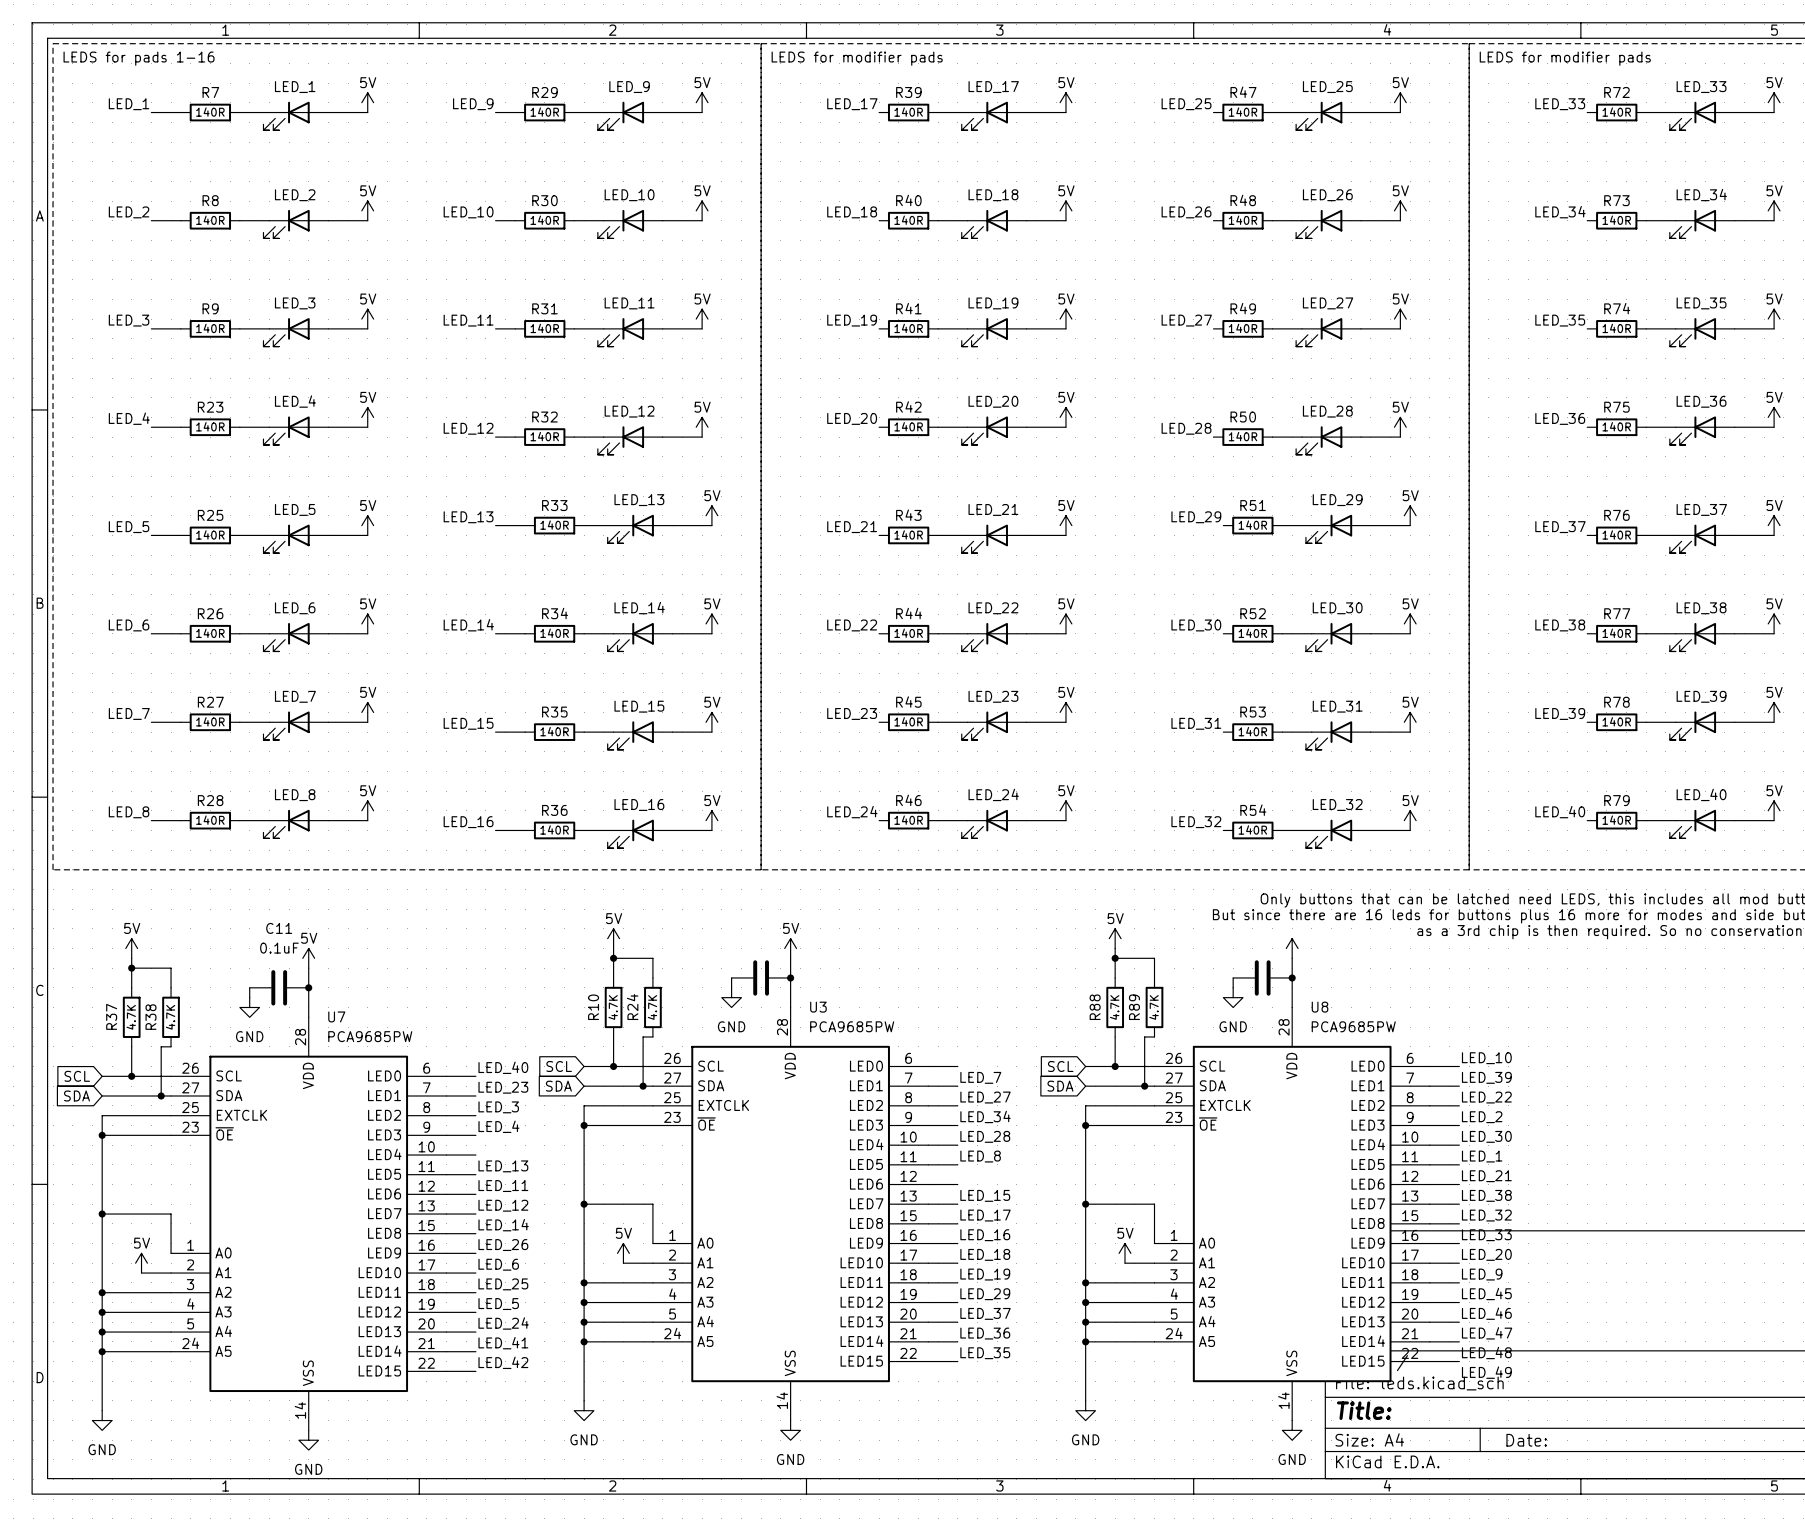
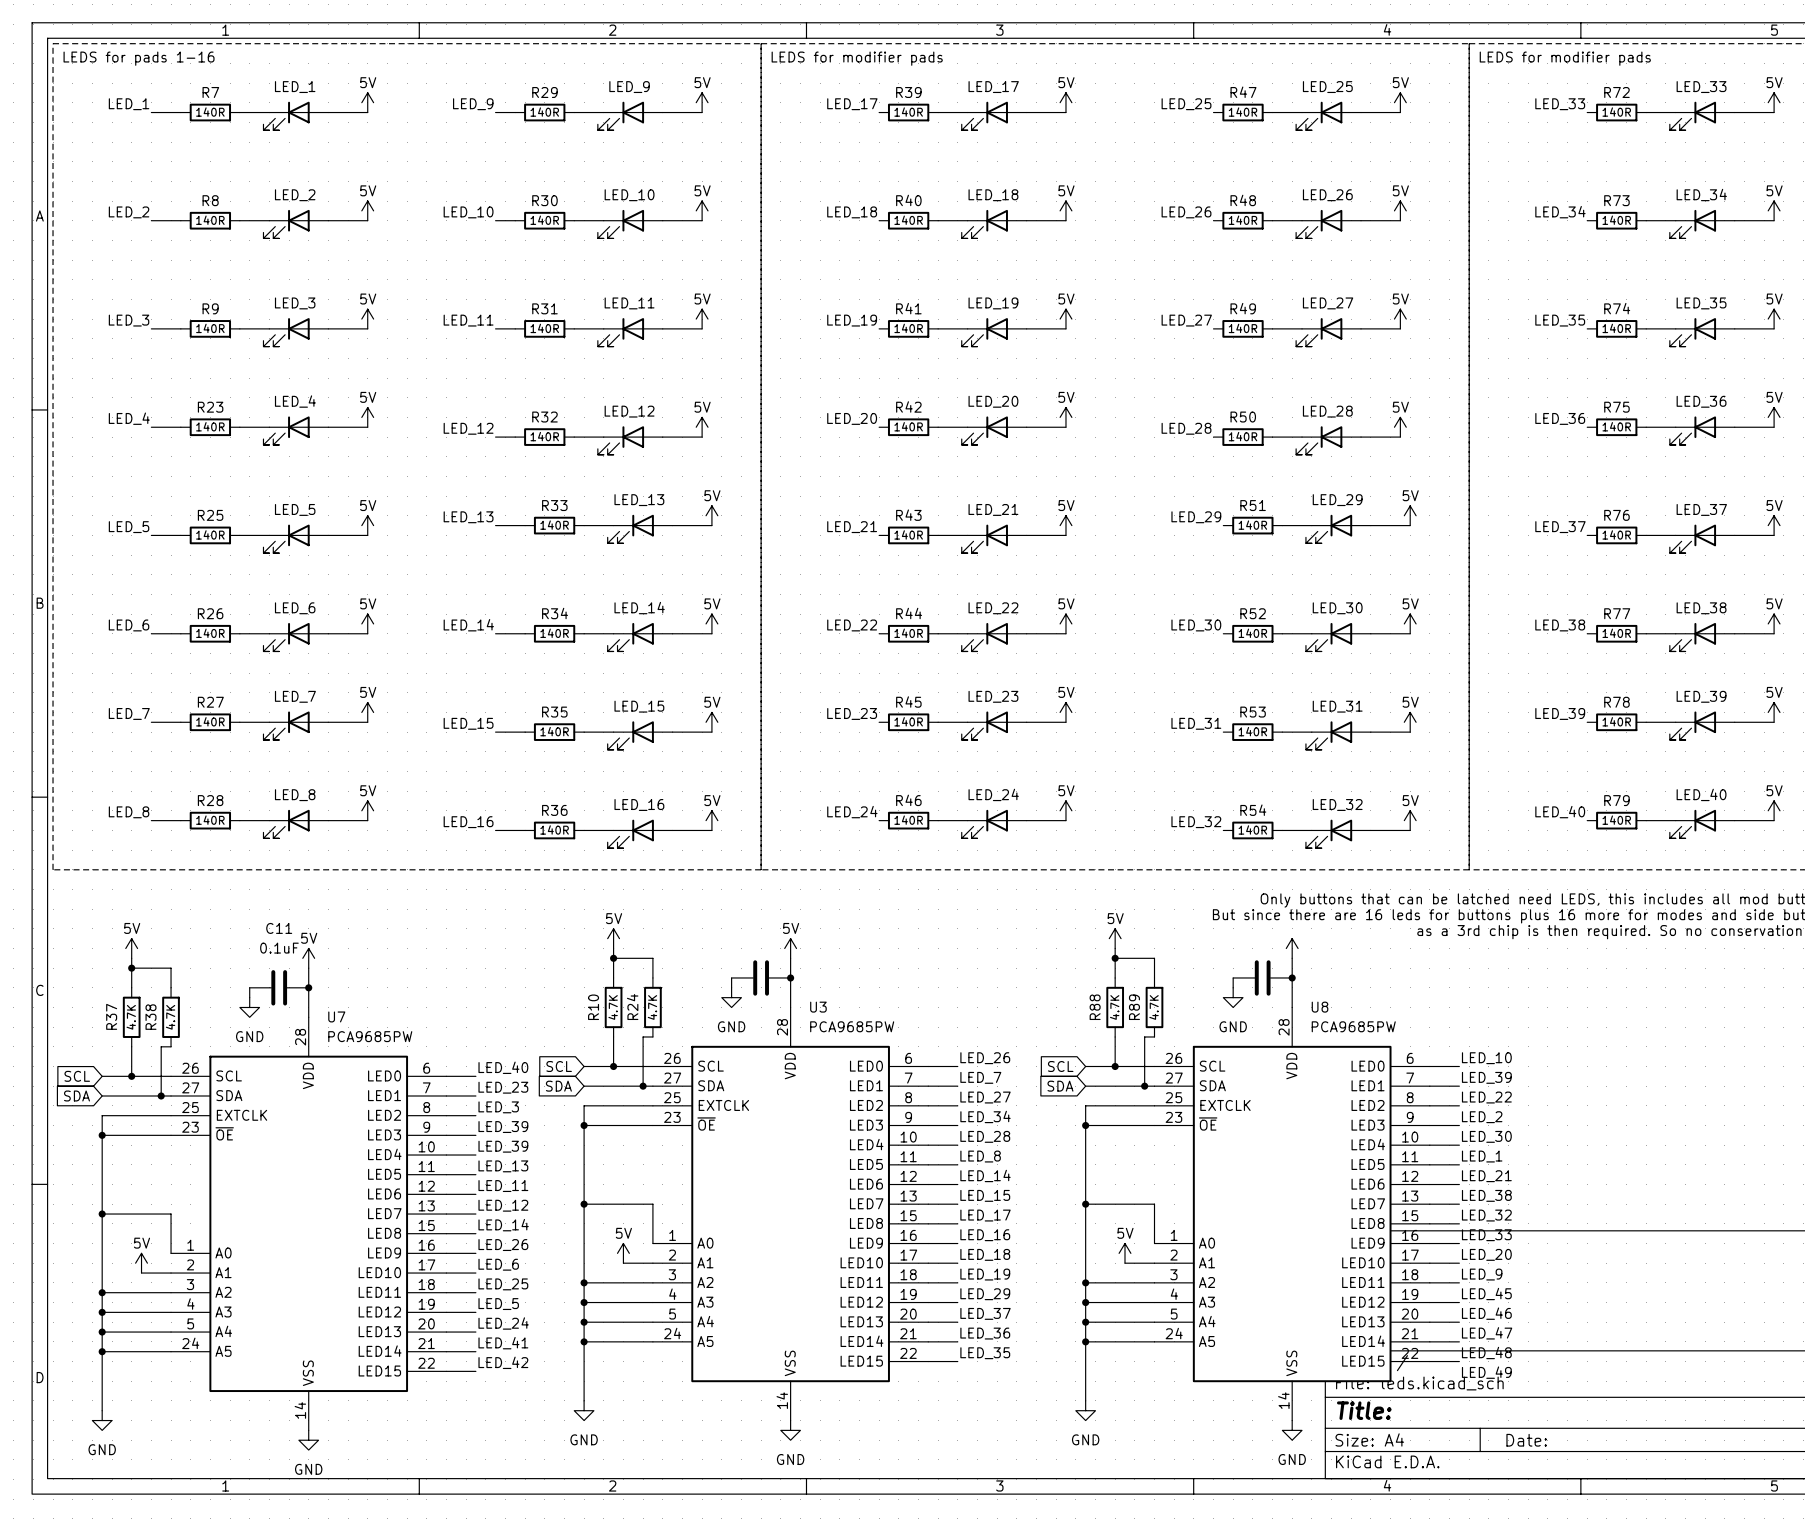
label: none -> LED_26 (985, 1058)
label: LED_4 (498, 1126) -> LED_39 (503, 1127)
label: none -> LED_39 (503, 1146)
label: none -> LED_14 (985, 1175)

